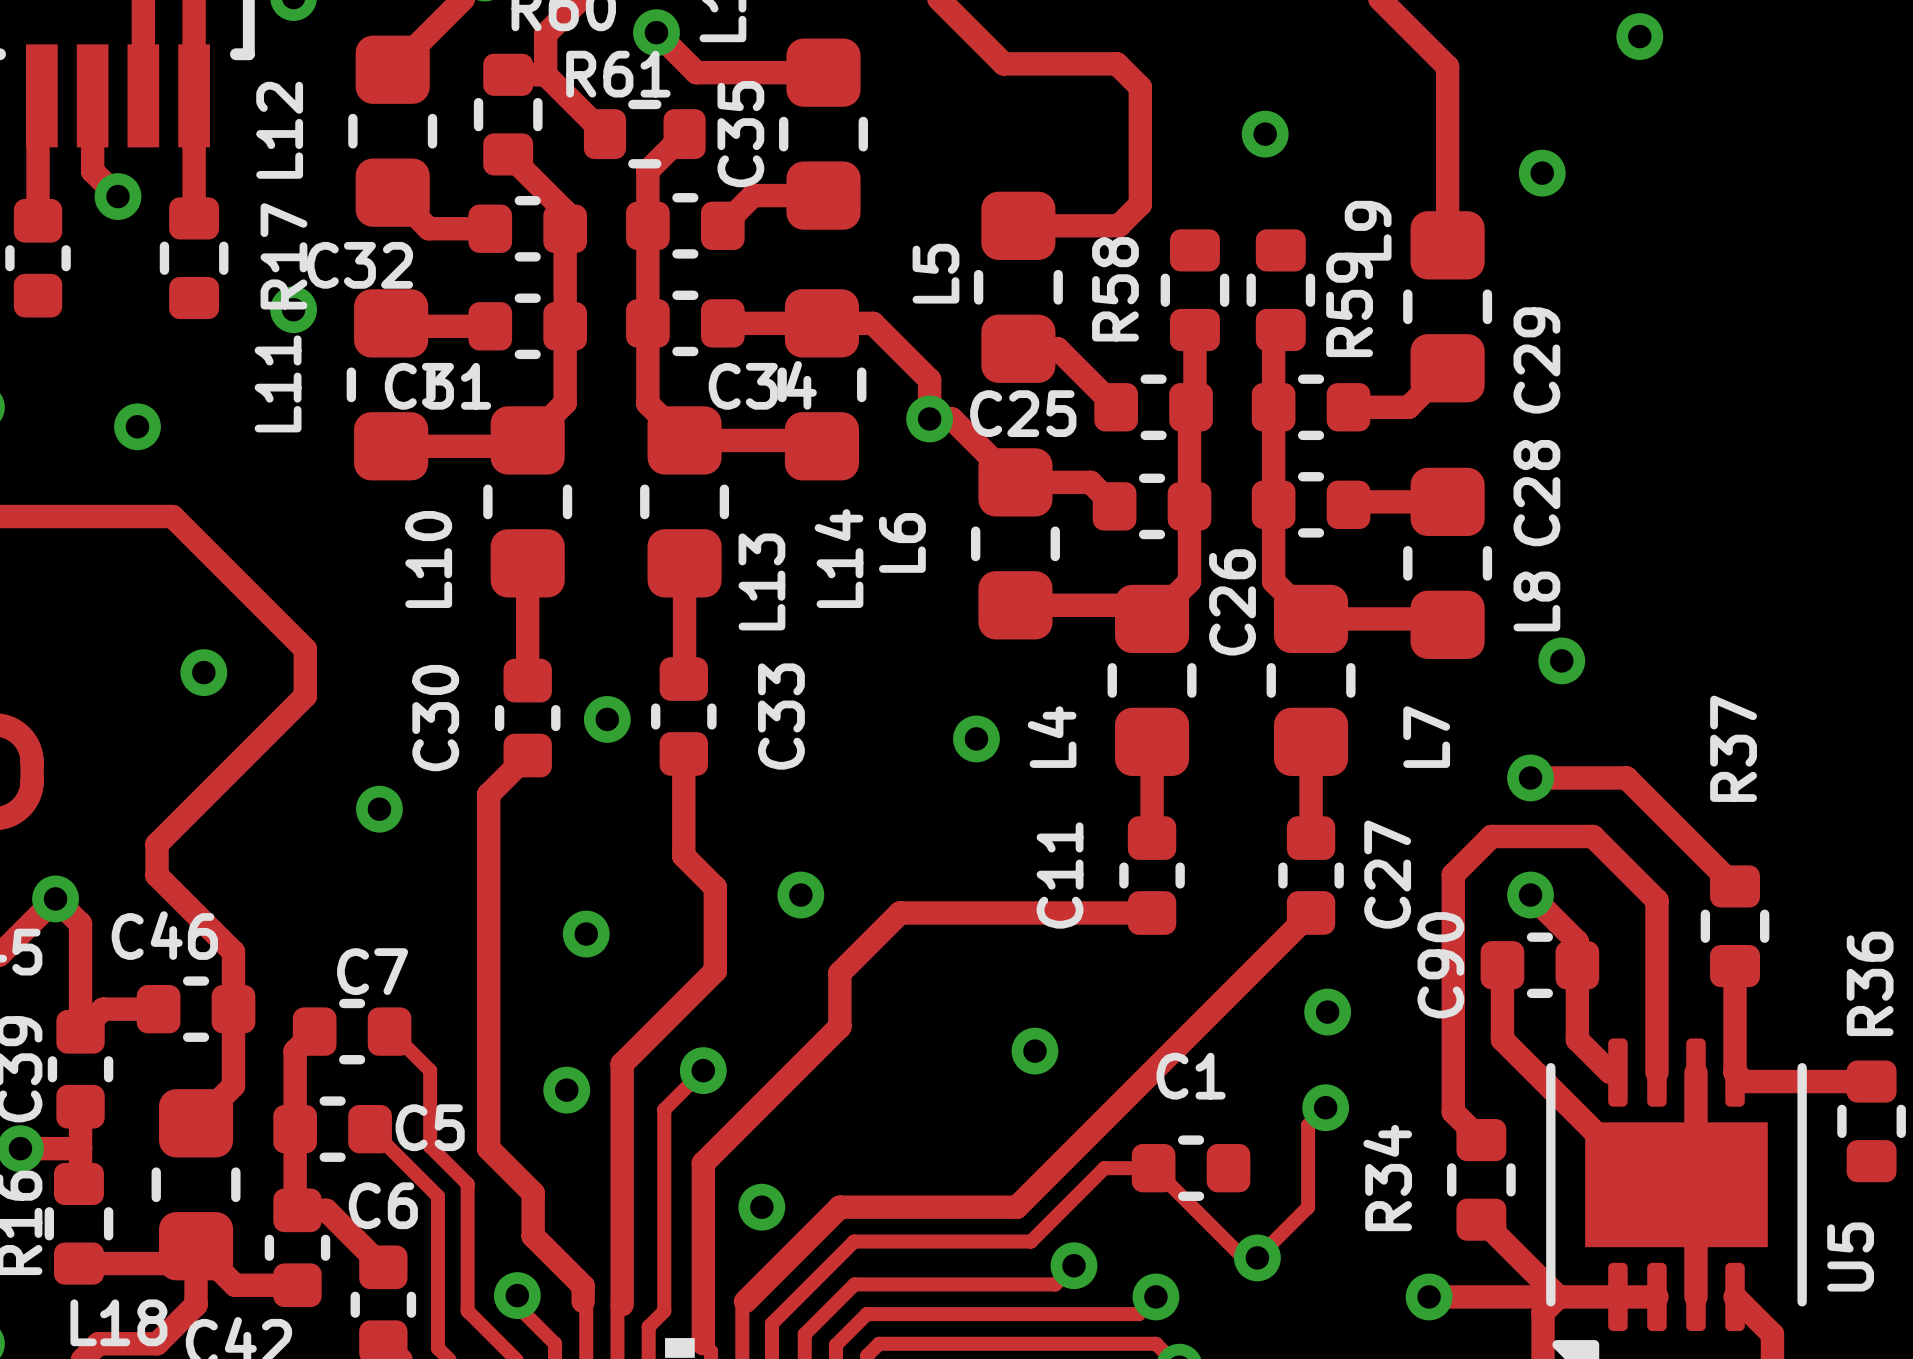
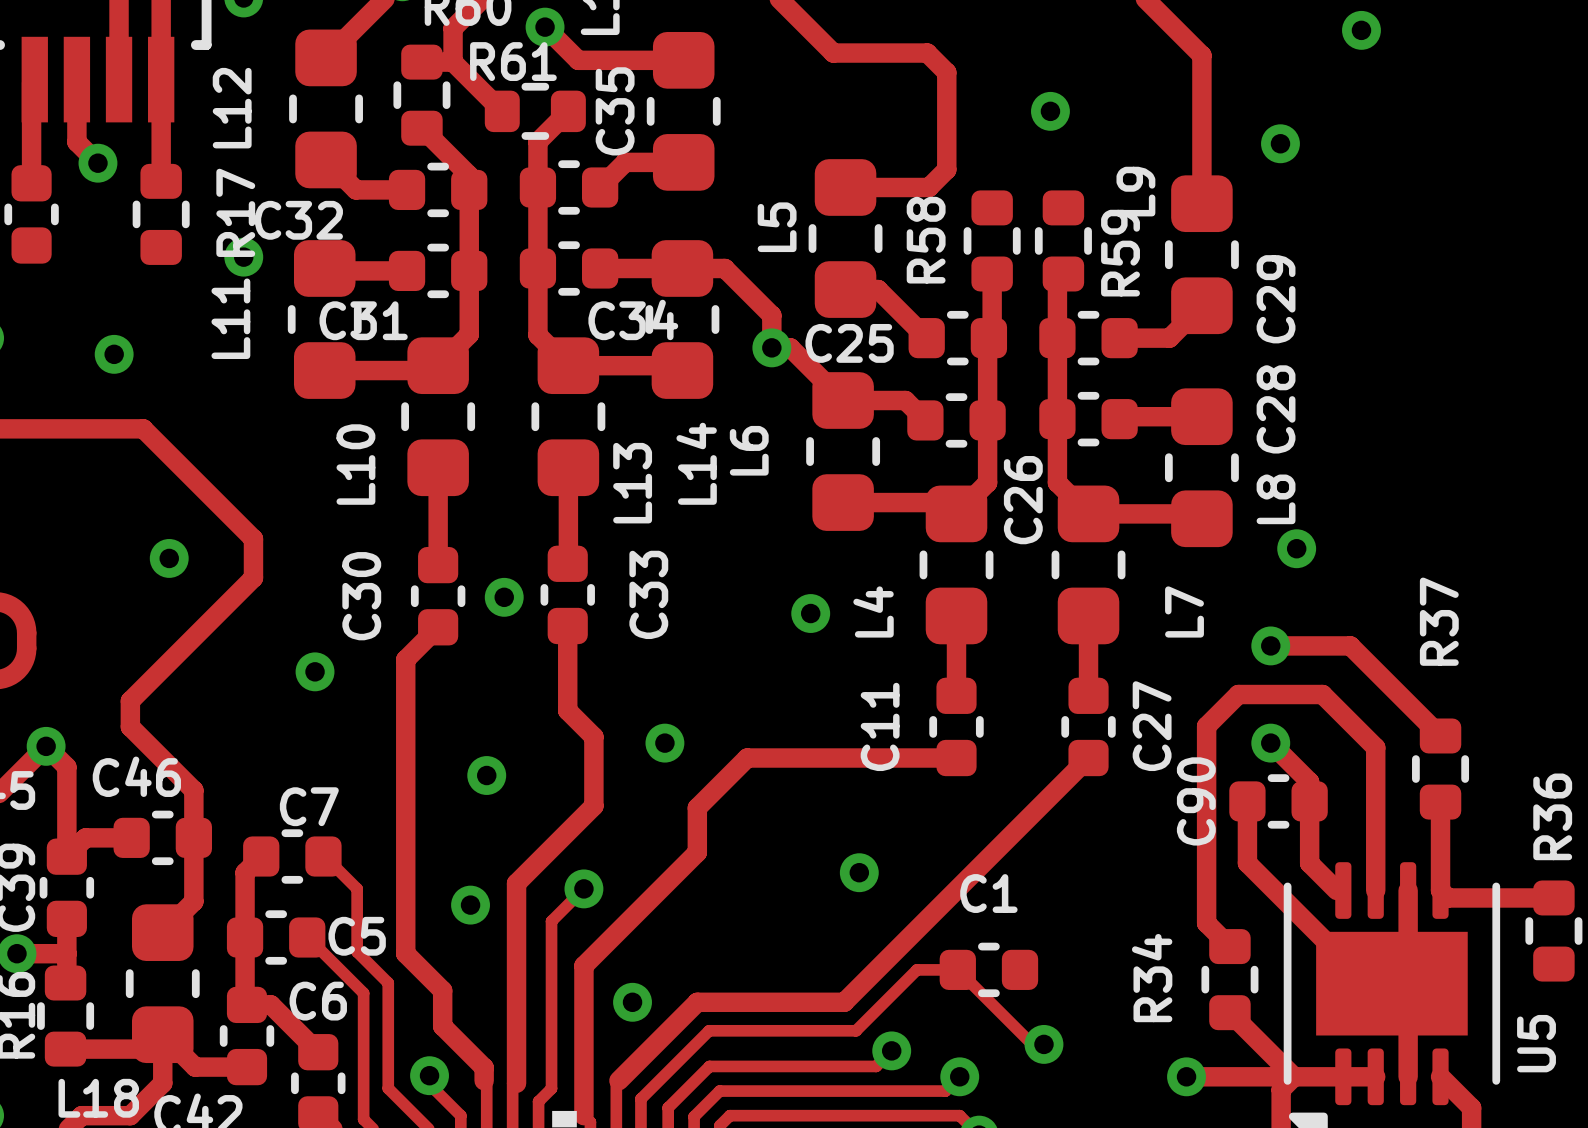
via: (1327, 1012) -> none
track: (1325, 1107) (1308, 1125) (1308, 1207) (1257, 1257) -> none
via: (1325, 1107) -> none

